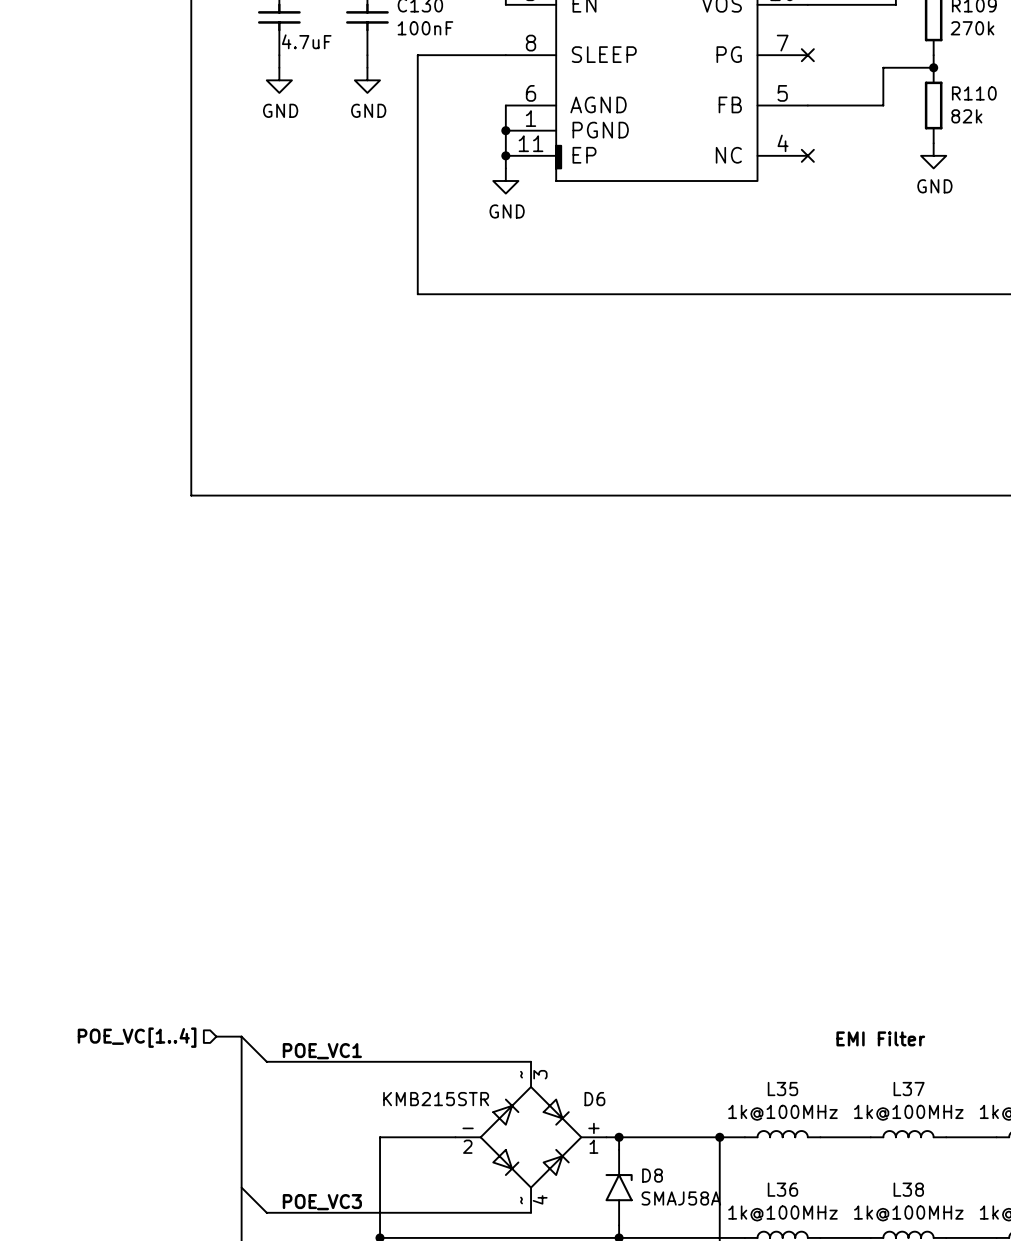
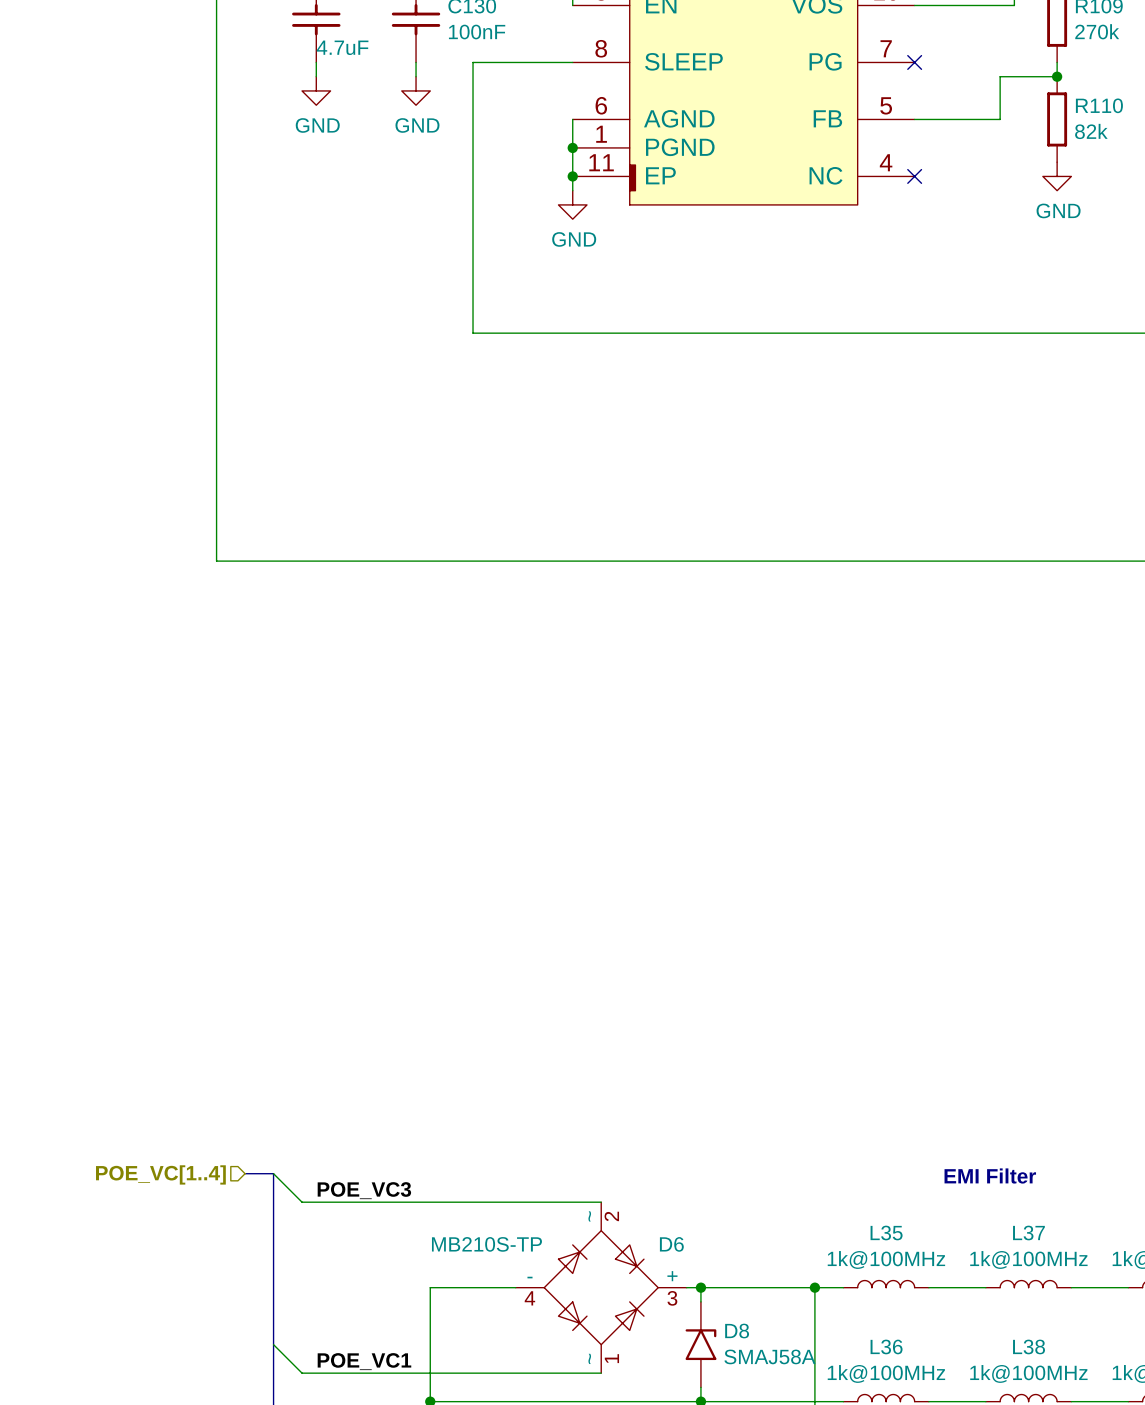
label: POE_VC1 (322, 1051) -> POE_VC3 (364, 1190)
D6 pin number: 3 (540, 1074) -> 2 (611, 1216)
D6 value: KMB215STR (436, 1099) -> MB210S-TP (486, 1244)
D6 pin number: 2 (467, 1146) -> 4 (529, 1298)
D6 pin number: 1 (593, 1146) -> 3 (672, 1298)
D6 pin number: 4 (540, 1199) -> 1 (611, 1358)
label: POE_VC3 (322, 1202) -> POE_VC1 (364, 1361)

